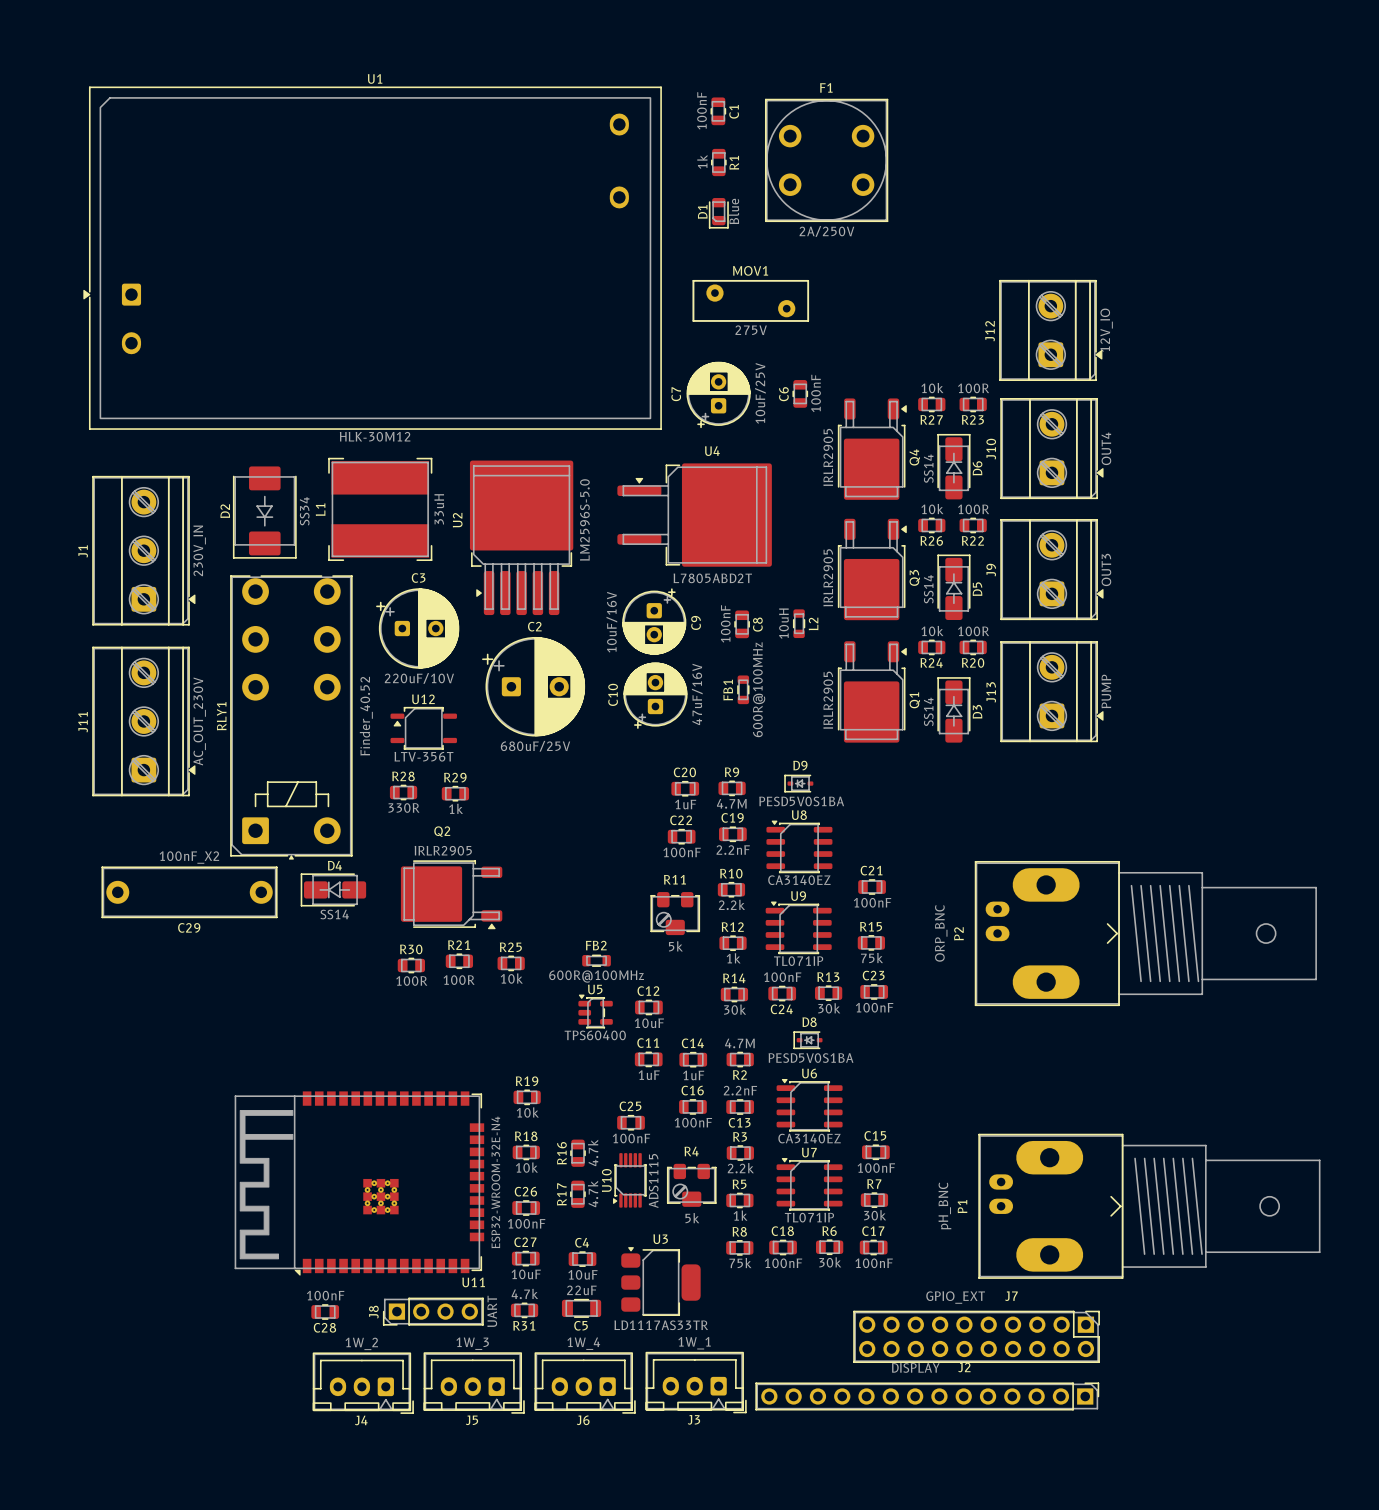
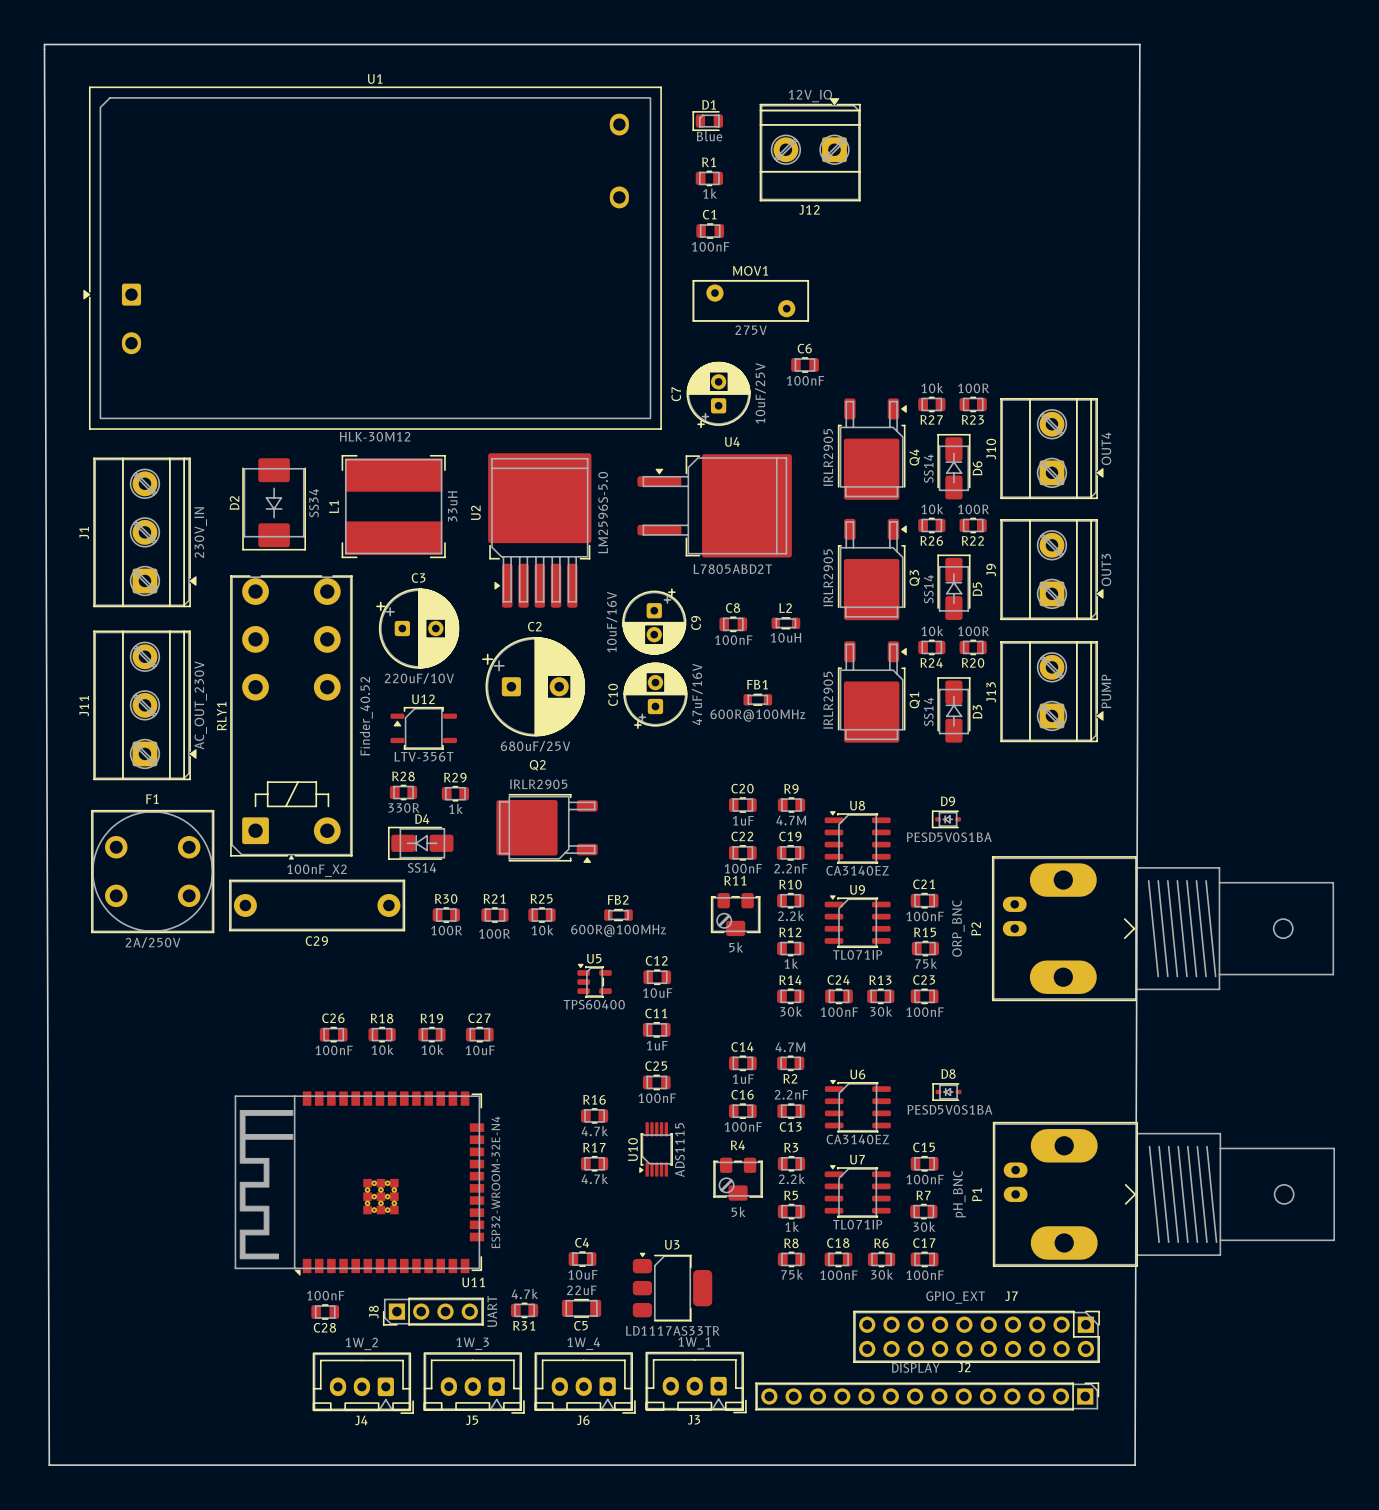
board edge: none -> (44, 44) (1139, 44) (1135, 1465) (49, 1465) (44, 44)
C1 value position: 100nF (701, 110) -> 100nF (710, 246)
C1 rotation: 0° (718, 111) -> 90° clockwise (710, 231)
C1 position: (718, 111) -> (710, 231)
C1 name position: C1 (734, 111) -> C1 (709, 214)
F1 position: (826, 160) -> (152, 871)
R1 value position: 1k (702, 161) -> 1k (709, 193)
R1 rotation: 0° (718, 162) -> 90° clockwise (709, 178)
R1 position: (718, 162) -> (709, 178)
R1 name position: R1 (734, 162) -> R1 (709, 162)
D1 rotation: 0° (718, 213) -> 90° clockwise (707, 121)
D1 position: (718, 213) -> (707, 121)
J12 rotation: 0° (1050, 330) -> 90° counterclockwise (810, 149)
J12 position: (1050, 330) -> (810, 149)
C6 rotation: 0° (800, 393) -> 90° clockwise (805, 364)
C6 position: (800, 393) -> (805, 364)
L1 position: (380, 509) -> (393, 506)
D2 position: (264, 512) -> (274, 504)
U4 position: (694, 515) -> (714, 505)
U2 position: (521, 537) -> (539, 530)
J1 position: (143, 550) -> (145, 532)
C8 value position: 100nF (725, 623) -> 100nF (733, 640)
L2 value position: 10uH (783, 623) -> 10uH (785, 637)
L2 rotation: 0° (799, 623) -> 90° clockwise (785, 623)
L2 name position: L2 (813, 623) -> L2 (785, 608)
C8 rotation: 0° (742, 624) -> 90° clockwise (733, 624)
C8 name position: C8 (757, 624) -> C8 (733, 607)
FB1 rotation: 0° (743, 689) -> 90° clockwise (757, 699)
FB1 position: (743, 689) -> (757, 699)
J11 position: (143, 721) -> (145, 705)
D9 position: (798, 783) -> (946, 819)
C20 position: (685, 788) -> (742, 805)
R9 position: (732, 788) -> (791, 805)
C19 position: (732, 834) -> (790, 852)
C22 position: (681, 836) -> (742, 852)
U8 position: (799, 846) -> (857, 837)
C21 position: (872, 887) -> (924, 900)
D4 position: (333, 889) -> (420, 843)
R10 position: (731, 889) -> (790, 900)
C29 position: (189, 892) -> (317, 905)
Q2 position: (451, 894) -> (547, 828)
R11 position: (675, 913) -> (735, 914)
U9 position: (798, 927) -> (857, 921)
P2 position: (1145, 933) -> (1162, 928)
R15 position: (871, 942) -> (925, 948)
R12 position: (733, 943) -> (790, 948)
FB2 position: (596, 960) -> (618, 915)
R21 position: (459, 961) -> (494, 915)
R25 position: (511, 963) -> (541, 915)
R30 position: (411, 965) -> (446, 915)
C24 value position: 100nF (782, 977) -> 100nF (839, 1012)
C23 position: (874, 991) -> (924, 996)
C24 position: (782, 993) -> (839, 996)
R13 position: (828, 993) -> (880, 996)
R14 position: (734, 994) -> (790, 996)
C12 position: (648, 1007) -> (657, 977)
C24 name position: C24 (781, 1009) -> C24 (838, 979)
U5 position: (595, 1011) -> (594, 980)
D8 position: (808, 1040) -> (947, 1092)
C11 position: (648, 1059) -> (656, 1029)
C14 position: (693, 1059) -> (742, 1063)
R2 position: (740, 1059) -> (790, 1063)
R19 position: (527, 1097) -> (431, 1034)
U6 position: (809, 1105) -> (857, 1106)
C16 position: (692, 1106) -> (742, 1111)
C13 position: (740, 1107) -> (791, 1111)
C25 position: (631, 1122) -> (656, 1082)
R18 position: (526, 1152) -> (382, 1034)
C15 position: (875, 1152) -> (924, 1163)
R16 rotation: 0° (578, 1153) -> 90° clockwise (594, 1115)
R16 position: (578, 1153) -> (594, 1115)
R3 position: (740, 1153) -> (791, 1163)
U10 position: (629, 1180) -> (655, 1149)
U7 position: (809, 1184) -> (857, 1191)
R4 position: (691, 1185) -> (738, 1179)
R17 rotation: 0° (577, 1194) -> 90° clockwise (594, 1163)
R17 position: (577, 1194) -> (594, 1163)
R5 position: (739, 1200) -> (791, 1211)
R7 position: (874, 1200) -> (923, 1211)
P1 position: (1149, 1206) -> (1163, 1194)
C26 position: (526, 1208) -> (333, 1034)
R8 position: (739, 1247) -> (791, 1259)
C18 position: (783, 1247) -> (838, 1259)
R6 position: (829, 1247) -> (881, 1259)
C17 position: (873, 1247) -> (924, 1259)
C27 position: (525, 1258) -> (479, 1034)
U3 position: (660, 1281) -> (672, 1287)

